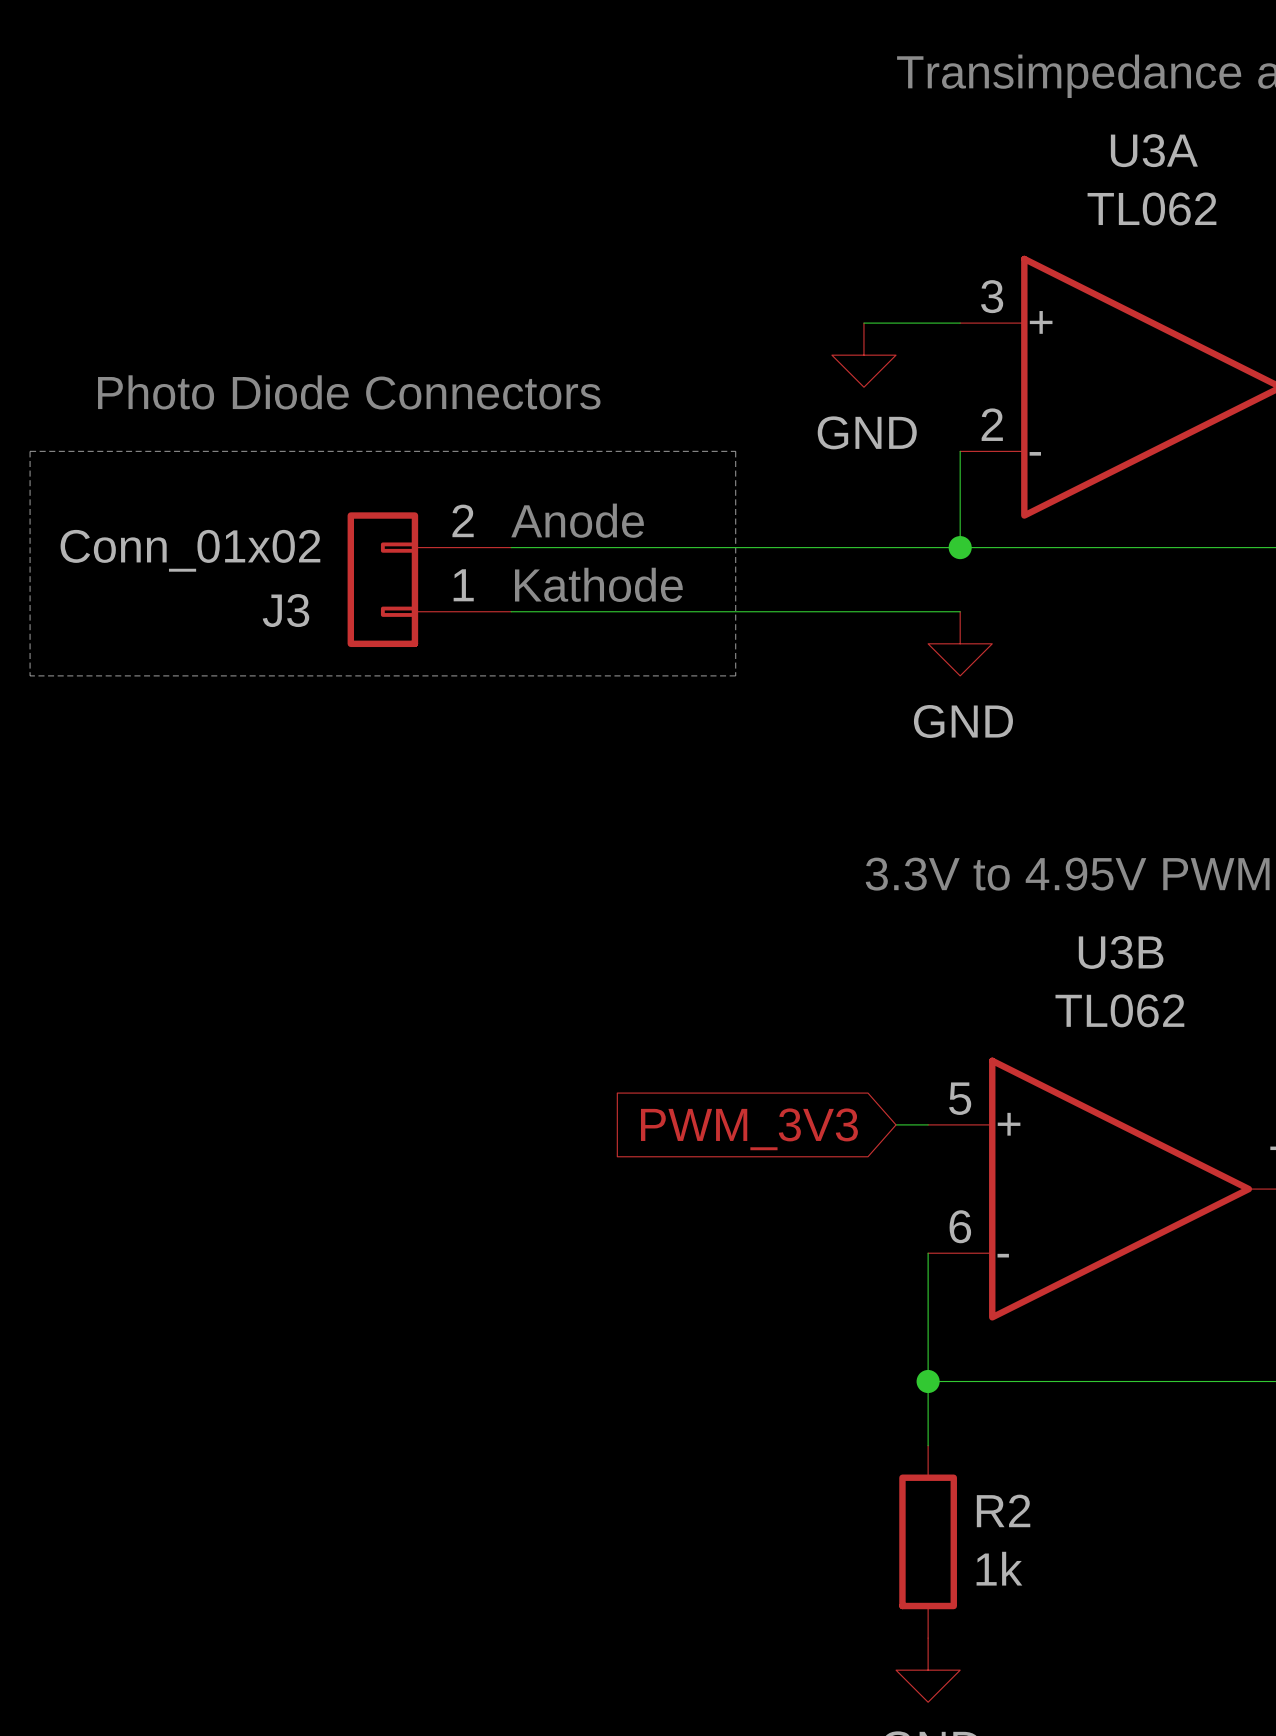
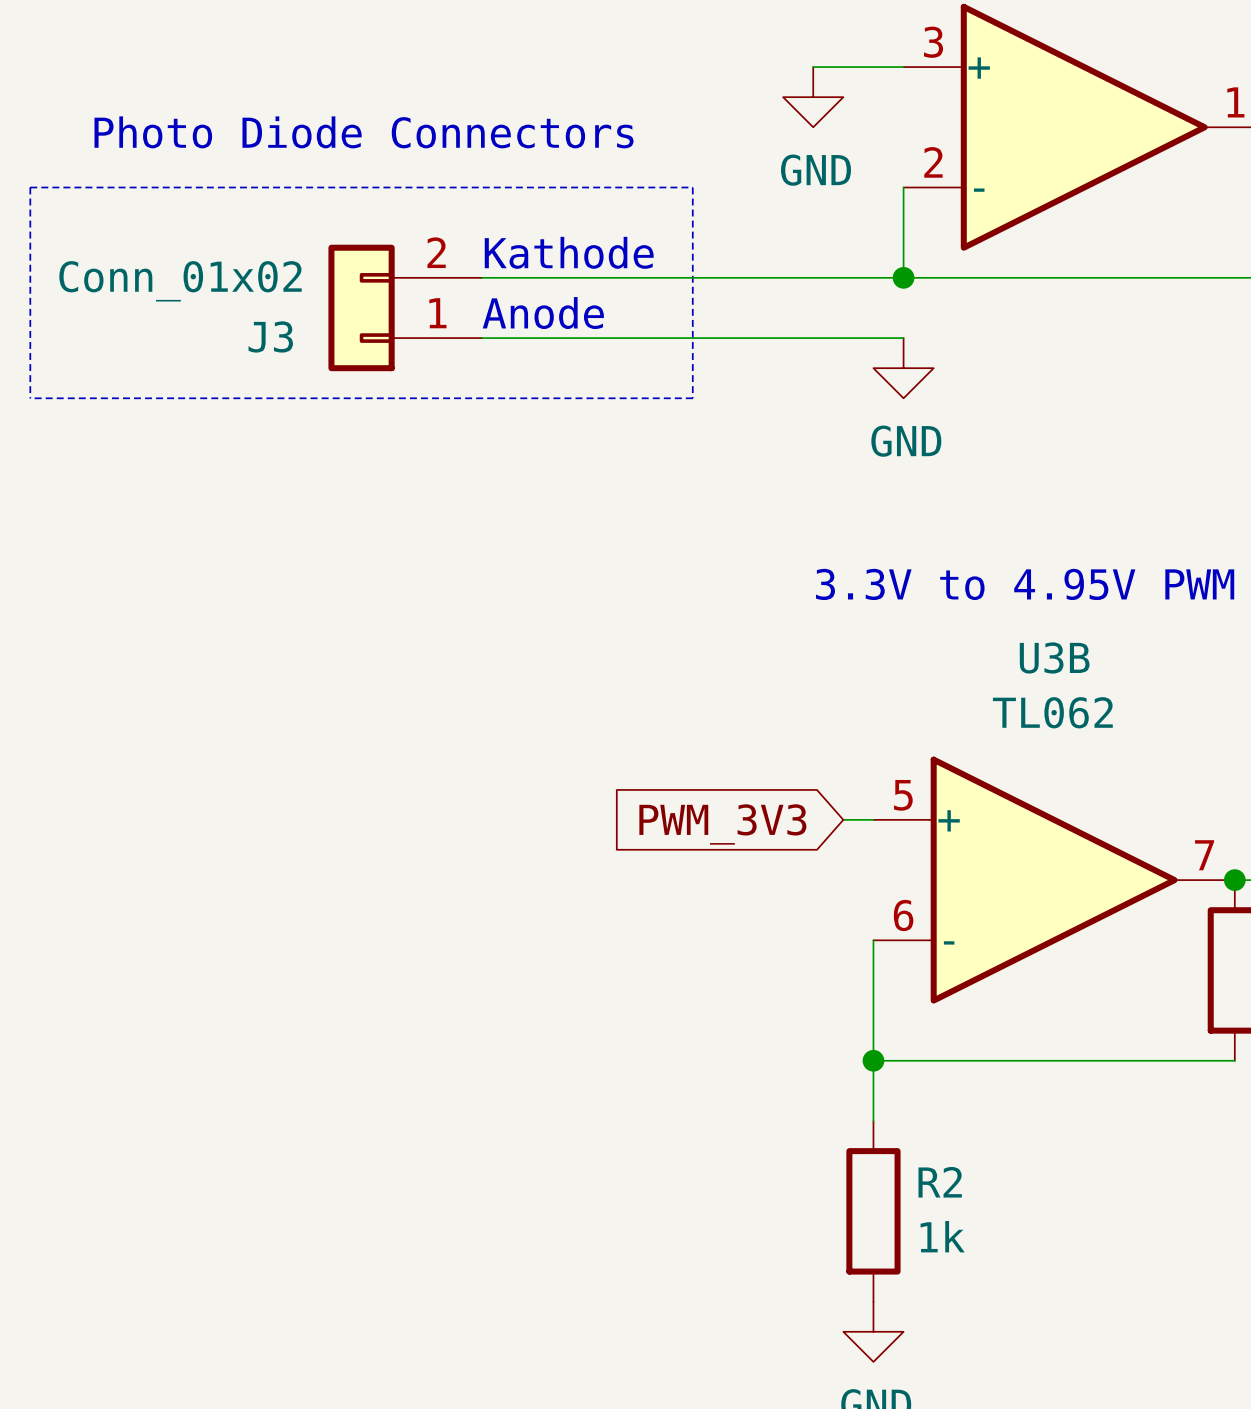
text: Anode (577, 520) -> Kathode (569, 252)
text: Kathode (598, 584) -> Anode (543, 313)

